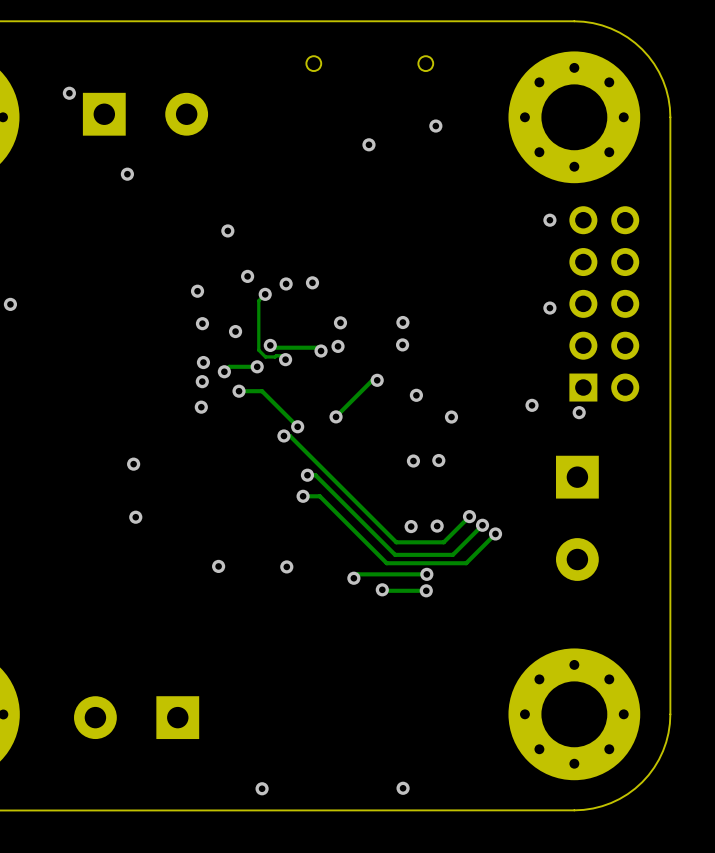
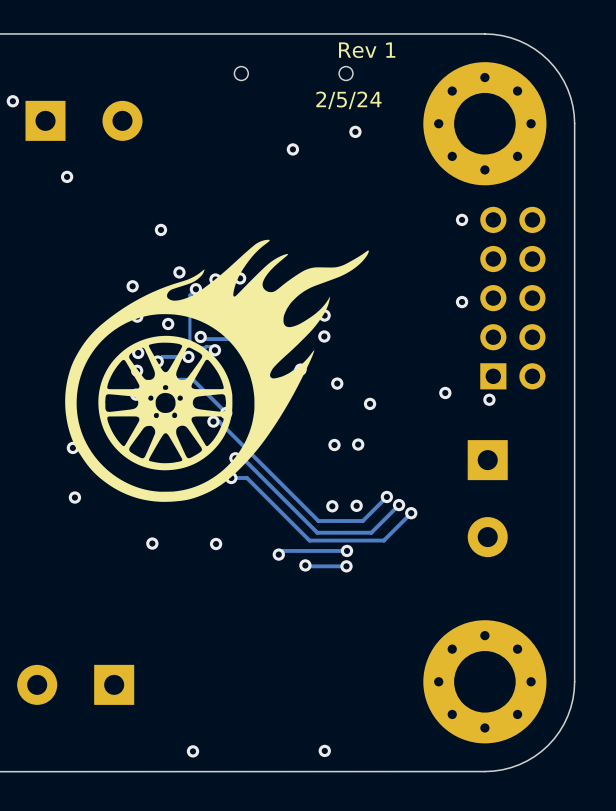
text: none -> Rev 1 (367, 50)
text: none -> 2/5/24 (348, 100)
drawing: none -> [65, 239, 369, 502]

